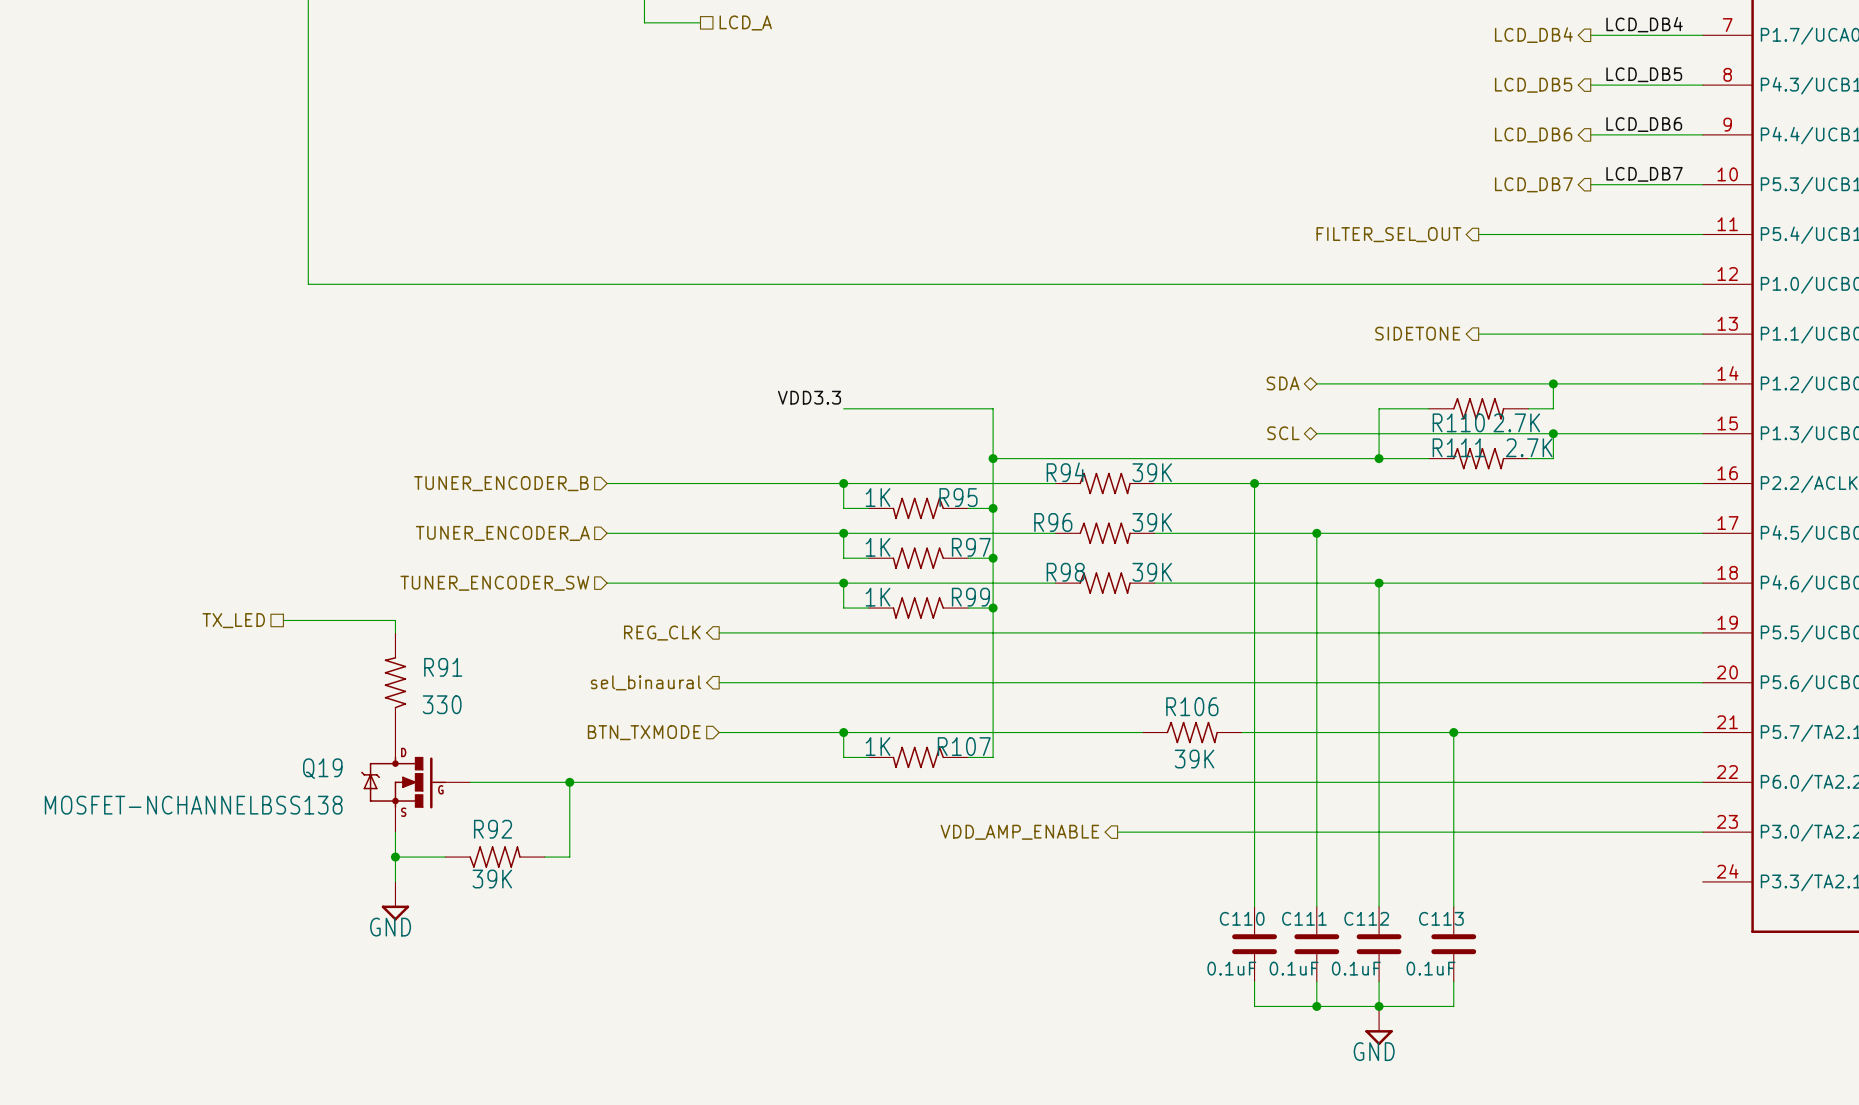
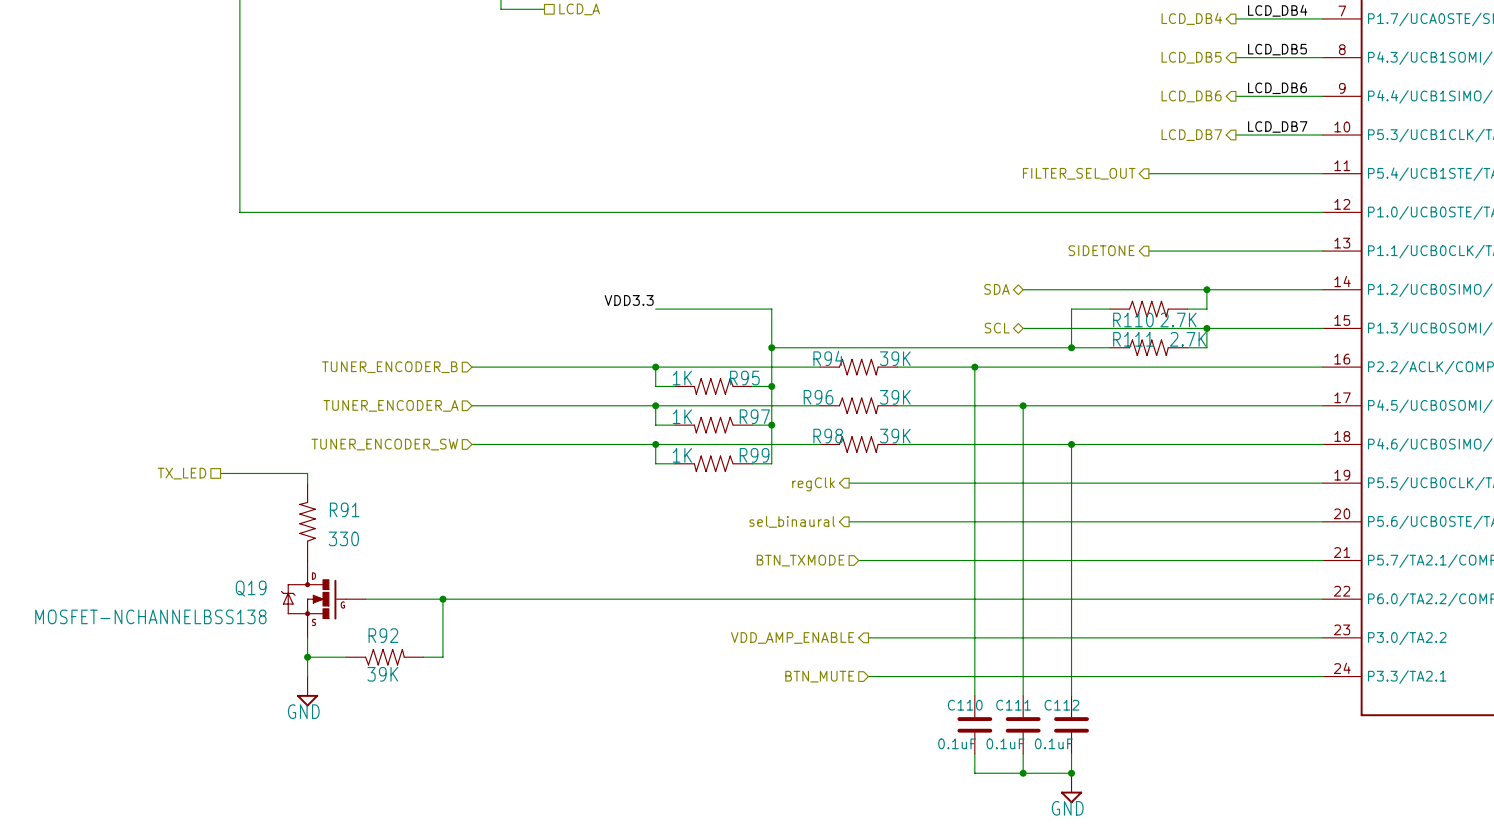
wire: (993, 608) (993, 757) (968, 757) -> none
junction: (993, 608) -> none
wire: (719, 632) (1092, 632) -> none
hierarchical label: REG_CLK (662, 633) -> none
hierarchical label: none -> regClk (813, 484)
hierarchical label: sel_binaural (646, 682) -> none
wire: (719, 682) (1092, 682) -> none
hierarchical label: none -> sel_binaural (792, 521)
hierarchical label: BTN_TXMODE (644, 732) -> none
wire: (719, 732) (1105, 732) -> none
wire: (843, 732) (843, 757) (868, 757) -> none
junction: (843, 732) -> none
hierarchical label: none -> BTN_TXMODE (800, 560)
R106: 39K (1192, 732) -> none
wire: (1453, 732) (1453, 906) -> none
junction: (1453, 732) -> none
R107: 1K (918, 757) -> none
wire: none -> (868, 676) (1322, 676)
hierarchical label: none -> BTN_MUTE (819, 676)
C113: 0.1uF (1453, 944) -> none
wire: (1453, 981) (1453, 1006) (1379, 1006) -> none

